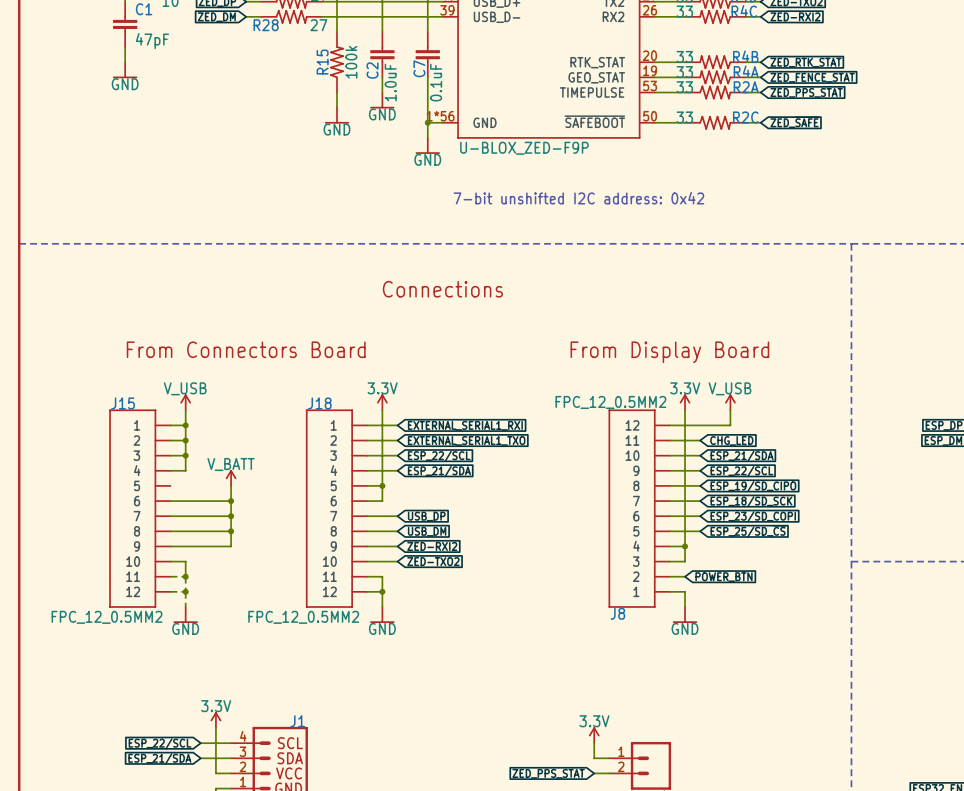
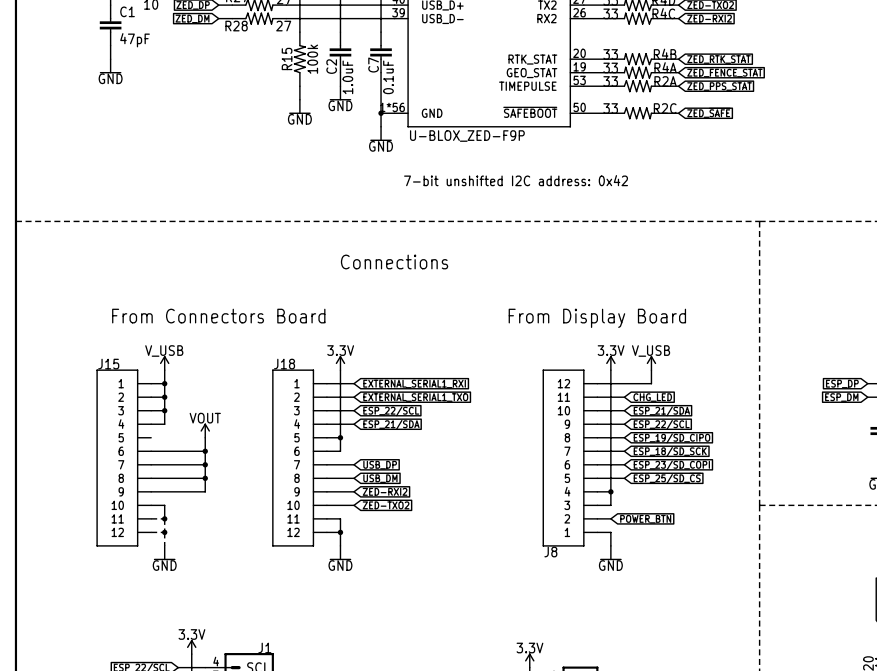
J8 value: FPC_12_0.5MM2 (610, 402) -> none
power symbol: V_BATT (231, 477) -> VOUT (205, 430)
J15 value: FPC_12_0.5MM2 (107, 617) -> none
J18 value: FPC_12_0.5MM2 (303, 617) -> none

